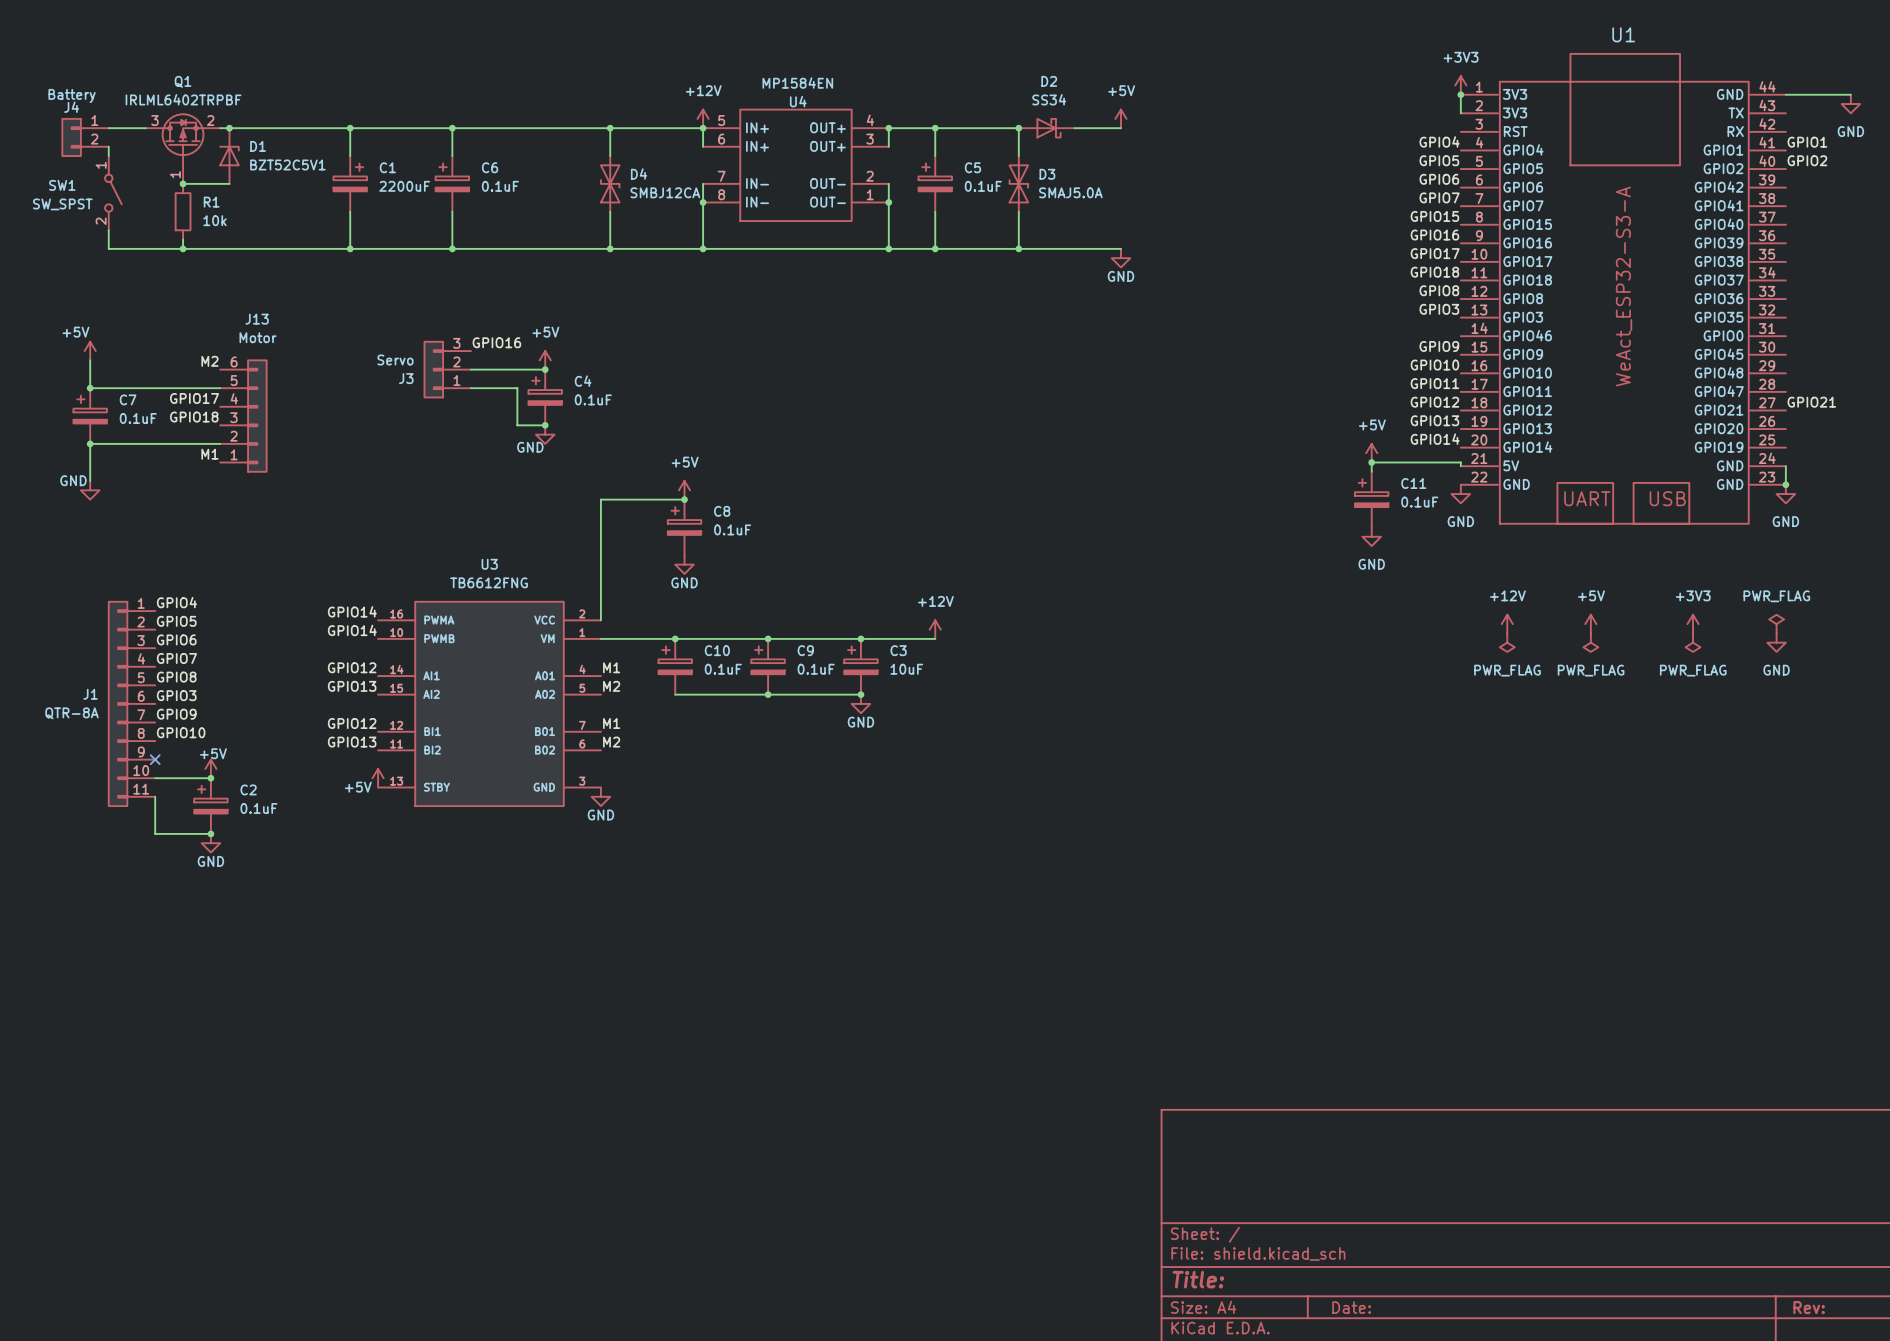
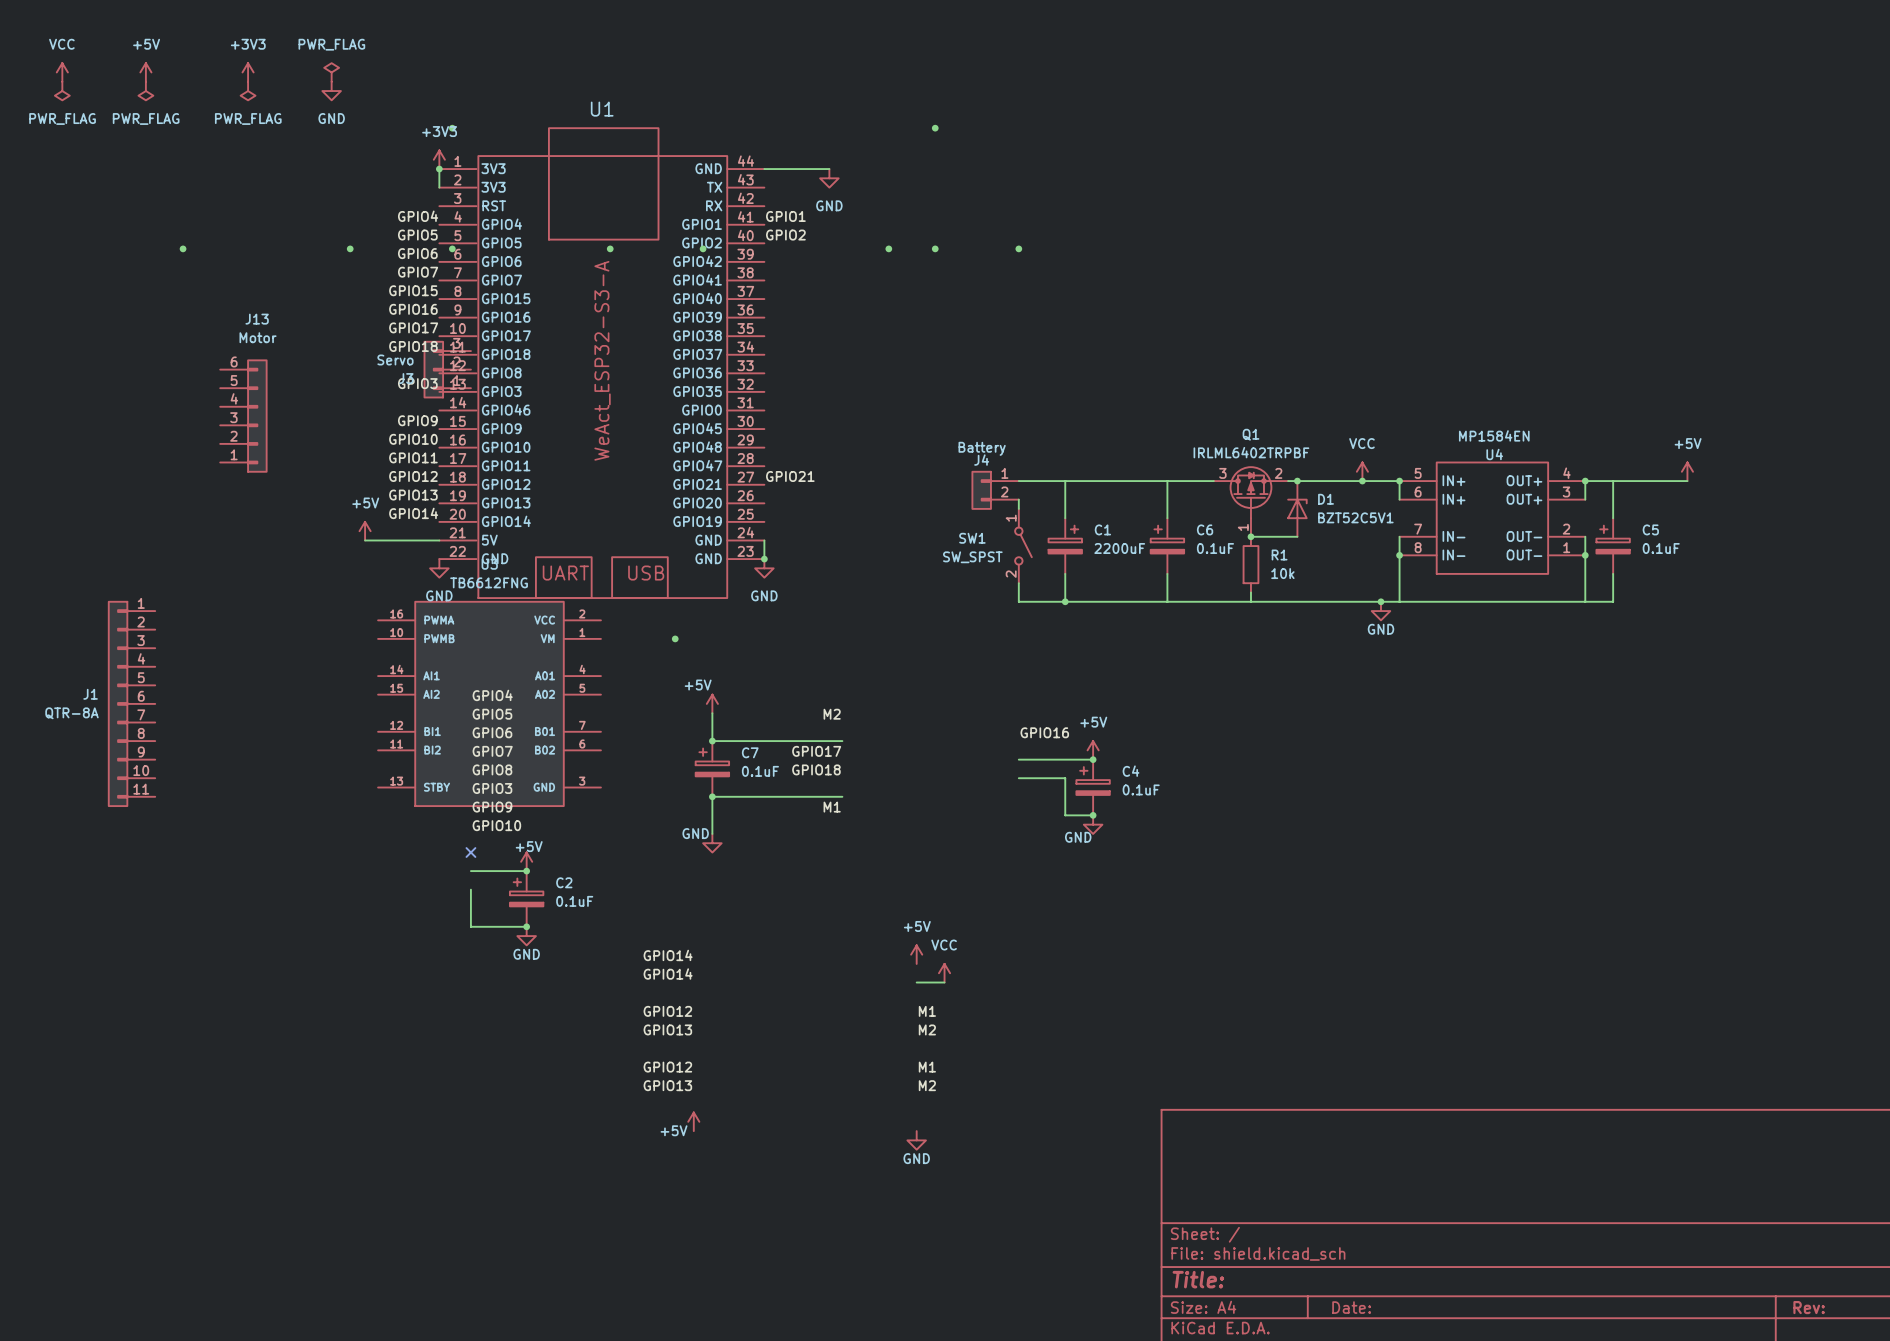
power symbol: none -> VCC (62, 72)
power symbol: none -> +5V (145, 72)
power symbol: none -> +3V3 (248, 72)
power symbol: none -> PWR_FLAG (331, 72)
power symbol: +3V3 (1460, 85) -> none
power symbol: none -> PWR_FLAG (62, 91)
power symbol: none -> PWR_FLAG (145, 91)
power symbol: none -> PWR_FLAG (248, 91)
power symbol: none -> GND (331, 91)
wire: (1460, 94) (1460, 113) -> none
junction: (1460, 94) -> none
wire: (1785, 94) (1850, 94) -> none
power symbol: GND (1850, 104) -> none
power symbol: +12V (703, 118) -> none
power symbol: +5V (1120, 118) -> none
wire: (108, 128) (145, 128) -> none
wire: (220, 128) (703, 128) (703, 146) -> none
junction: (229, 128) -> none
wire: (350, 128) (350, 156) -> none
junction: (350, 128) -> none
wire: (452, 128) (452, 156) -> none
wire: (610, 128) (610, 156) -> none
junction: (610, 128) -> none
junction: (703, 128) -> none
junction: (888, 128) -> none
wire: (935, 128) (935, 156) -> none
junction: (1018, 128) -> none
D2: SS34 (1046, 128) -> none
wire: (1074, 128) (1120, 128) -> none
J4 position: (85, 137) -> (995, 490)
label: GPIO4 (1439, 141) -> none
label: GPIO1 (1807, 142) -> none
wire: (108, 146) (108, 156) -> none
wire: (888, 146) (888, 128) (1018, 128) (1018, 156) -> none
Q1 position: (183, 148) -> (1250, 501)
D1 position: (229, 156) -> (1297, 508)
power symbol: none -> +3V3 (439, 159)
label: GPIO5 (1439, 160) -> none
label: GPIO2 (1807, 160) -> none
U4 position: (795, 165) -> (1492, 518)
wire: none -> (439, 169) (439, 187)
junction: none -> (439, 169)
wire: none -> (764, 169) (829, 169)
power symbol: none -> GND (829, 178)
label: GPIO6 (1439, 179) -> none
wire: (183, 183) (229, 183) -> none
junction: (183, 183) -> none
C1 position: (350, 183) -> (1065, 546)
C6 position: (452, 183) -> (1167, 546)
D4: SMBJ12CA (610, 183) -> none
wire: (703, 183) (703, 248) -> none
wire: (888, 183) (888, 248) -> none
C5 position: (935, 183) -> (1613, 546)
D3: SMAJ5.0A (1018, 183) -> none
SW1 position: (113, 193) -> (1023, 546)
label: GPIO7 (1439, 197) -> none
junction: (703, 202) -> none
junction: (888, 202) -> none
R1 position: (183, 211) -> (1250, 564)
wire: (350, 211) (350, 248) -> none
wire: (452, 211) (452, 248) -> none
wire: (610, 211) (610, 248) -> none
wire: (935, 211) (935, 248) -> none
wire: (1018, 211) (1018, 248) -> none
label: none -> GPIO4 (418, 216)
label: none -> GPIO1 (785, 216)
label: GPIO15 (1434, 216) -> none
wire: (108, 230) (108, 248) (1120, 248) -> none
label: none -> GPIO5 (417, 235)
label: none -> GPIO2 (785, 235)
label: GPIO16 (1434, 235) -> none
wire: (183, 239) (183, 248) -> none
label: none -> GPIO6 (417, 253)
label: GPIO17 (1435, 253) -> none
power symbol: GND (1120, 258) -> none
label: none -> GPIO7 (418, 272)
label: GPIO18 (1434, 272) -> none
U1 position: (1623, 288) -> (601, 363)
label: none -> GPIO15 (413, 290)
label: GPIO8 (1439, 290) -> none
label: GPIO3 (1439, 309) -> none
label: none -> GPIO17 (413, 327)
label position: GPIO16 (496, 342) -> GPIO16 (413, 309)
label: none -> GPIO18 (413, 346)
label: GPIO9 (1439, 346) -> none
power symbol: +5V (90, 351) -> none
wire: (90, 360) (90, 388) (220, 388) -> none
power symbol: +5V (545, 360) -> none
label: M2 (209, 361) -> none
label: GPIO10 (1434, 365) -> none
wire: (470, 369) (545, 369) -> none
junction: (545, 369) -> none
label: none -> GPIO3 (417, 383)
label: GPIO11 (1434, 383) -> none
junction: (90, 388) -> none
wire: (470, 388) (517, 388) (517, 425) (545, 425) -> none
C4 position: (545, 397) -> (1093, 787)
label: GPIO17 (194, 398) -> none
label: GPIO12 (1434, 402) -> none
label: GPIO21 (1811, 402) -> none
C7 position: (90, 416) -> (712, 768)
label: GPIO18 (194, 417) -> none
label: none -> GPIO9 (417, 420)
label: GPIO13 (1434, 420) -> none
junction: (545, 425) -> none
power symbol: GND (545, 434) -> none
label: none -> GPIO10 (413, 439)
label: GPIO14 (1435, 439) -> none
junction: (90, 443) -> none
wire: (220, 443) (90, 443) (90, 481) -> none
power symbol: +5V (1371, 453) -> none
label: M1 (209, 454) -> none
label: none -> GPIO11 (413, 457)
junction: (1371, 462) -> none
wire: (1460, 466) (1460, 462) (1371, 462) (1371, 471) -> none
wire: (1785, 466) (1785, 484) -> none
power symbol: none -> VCC (1362, 471)
power symbol: none -> +5V (1687, 471)
label: none -> GPIO12 (413, 476)
label: none -> GPIO21 (790, 476)
wire: none -> (1018, 481) (1213, 481)
wire: none -> (1065, 481) (1065, 518)
wire: none -> (1167, 481) (1167, 518)
wire: none -> (1288, 481) (1399, 481) (1399, 499)
junction: none -> (1297, 481)
junction: none -> (1362, 481)
junction: none -> (1399, 481)
junction: none -> (1585, 481)
wire: none -> (1687, 481) (1585, 481) (1585, 499)
junction: (1785, 484) -> none
power symbol: GND (90, 490) -> none
power symbol: +5V (684, 490) -> none
power symbol: GND (1460, 494) -> none
power symbol: GND (1785, 494) -> none
label: none -> GPIO13 (413, 495)
wire: (684, 499) (600, 499) (600, 620) -> none
junction: (684, 499) -> none
wire: none -> (1018, 499) (1018, 508)
C11: 0.1uF (1371, 499) -> none
label: none -> GPIO14 (413, 513)
C8: 0.1uF (684, 527) -> none
power symbol: none -> +5V (365, 531)
wire: none -> (1250, 536) (1297, 536)
junction: none -> (1250, 536)
power symbol: GND (1371, 536) -> none
wire: none -> (1399, 536) (1399, 601)
wire: none -> (1585, 536) (1585, 601)
wire: none -> (365, 540) (439, 540)
wire: none -> (764, 540) (764, 559)
junction: none -> (1399, 555)
junction: none -> (1585, 555)
junction: none -> (764, 559)
power symbol position: GND (684, 564) -> GND (764, 568)
power symbol: none -> GND (439, 568)
wire: none -> (1065, 573) (1065, 601)
wire: none -> (1167, 573) (1167, 601)
wire: none -> (1613, 573) (1613, 601) (1018, 601) (1018, 583)
power symbol text position: GND (684, 582) -> GND (764, 595)
wire: none -> (1250, 592) (1250, 601)
junction: none -> (1065, 601)
junction: none -> (1380, 601)
label: GPIO4 (176, 602) -> none
label: GPIO14 (352, 611) -> none
power symbol: none -> GND (1380, 611)
label: GPIO5 (176, 621) -> none
power symbol: +12V (1507, 624) -> none
power symbol: +5V (1590, 624) -> none
power symbol: +3V3 (1693, 624) -> none
power symbol: PWR_FLAG (1776, 624) -> none
power symbol: +12V (935, 629) -> none
label: GPIO14 (352, 630) -> none
wire: (600, 638) (935, 638) -> none
junction: (768, 638) -> none
junction: (860, 638) -> none
label: GPIO6 (176, 639) -> none
power symbol: PWR_FLAG (1507, 642) -> none
power symbol: PWR_FLAG (1590, 642) -> none
power symbol: PWR_FLAG (1693, 642) -> none
power symbol: GND (1776, 642) -> none
label: GPIO7 (176, 658) -> none
C10: 0.1uF (675, 666) -> none
C9: 0.1uF (768, 666) -> none
C3: 10uF (860, 666) -> none
label: GPIO12 (352, 667) -> none
label: M1 (611, 667) -> none
label: GPIO8 (176, 677) -> none
label: GPIO13 (352, 686) -> none
label: M2 (611, 686) -> none
wire: (675, 694) (860, 694) -> none
junction: (768, 694) -> none
junction: (860, 694) -> none
label: GPIO3 (176, 695) -> none
label: none -> GPIO4 (492, 695)
power symbol: none -> +5V (712, 703)
power symbol: GND (860, 703) -> none
wire: none -> (712, 713) (712, 741) (842, 741)
label: GPIO9 (176, 714) -> none
label: none -> GPIO5 (492, 714)
label: none -> M2 (832, 714)
label: GPIO12 (352, 723) -> none
label: M1 (611, 723) -> none
label: GPIO10 (181, 732) -> none
label: none -> GPIO6 (492, 732)
label: none -> GPIO16 (1044, 732)
junction: none -> (712, 741)
label: GPIO13 (352, 742) -> none
label: M2 (611, 742) -> none
power symbol: none -> +5V (1093, 750)
label: none -> GPIO7 (492, 751)
label: none -> GPIO17 (816, 751)
no-connect mark: (155, 759) -> none
wire: none -> (1018, 759) (1093, 759)
junction: none -> (1093, 759)
power symbol: +5V (210, 768) -> none
label: none -> GPIO8 (492, 769)
label: none -> GPIO18 (816, 769)
wire: (155, 778) (210, 778) -> none
junction: (210, 778) -> none
power symbol: +5V (378, 778) -> none
wire: none -> (1018, 778) (1065, 778) (1065, 815) (1093, 815)
label: none -> GPIO3 (492, 788)
wire: (155, 796) (155, 833) (210, 833) -> none
power symbol: GND (600, 796) -> none
junction: none -> (712, 796)
wire: none -> (842, 796) (712, 796) (712, 833)
C2 position: (210, 806) -> (526, 898)
label: none -> GPIO9 (492, 807)
label: none -> M1 (832, 807)
junction: none -> (1093, 815)
power symbol: none -> GND (1093, 824)
label: none -> GPIO10 (496, 825)
junction: (210, 833) -> none
power symbol: GND (210, 843) -> none
power symbol: none -> GND (712, 843)
no-connect mark: none -> (470, 852)
power symbol: none -> +5V (526, 861)
wire: none -> (470, 871) (526, 871)
junction: none -> (526, 871)
wire: none -> (470, 889) (470, 926) (526, 926)
junction: none -> (526, 926)
power symbol: none -> GND (526, 936)
power symbol: none -> +5V (916, 954)
label: none -> GPIO14 (668, 955)
power symbol: none -> VCC (944, 973)
label: none -> GPIO14 (668, 974)
wire: none -> (916, 982) (944, 982)
label: none -> GPIO12 (667, 1011)
label: none -> M1 (927, 1011)
label: none -> GPIO13 (667, 1029)
label: none -> M2 (927, 1029)
label: none -> GPIO12 (667, 1067)
label: none -> M1 (927, 1067)
label: none -> GPIO13 (667, 1085)
label: none -> M2 (927, 1085)
power symbol: none -> +5V (693, 1121)
power symbol: none -> GND (916, 1140)

